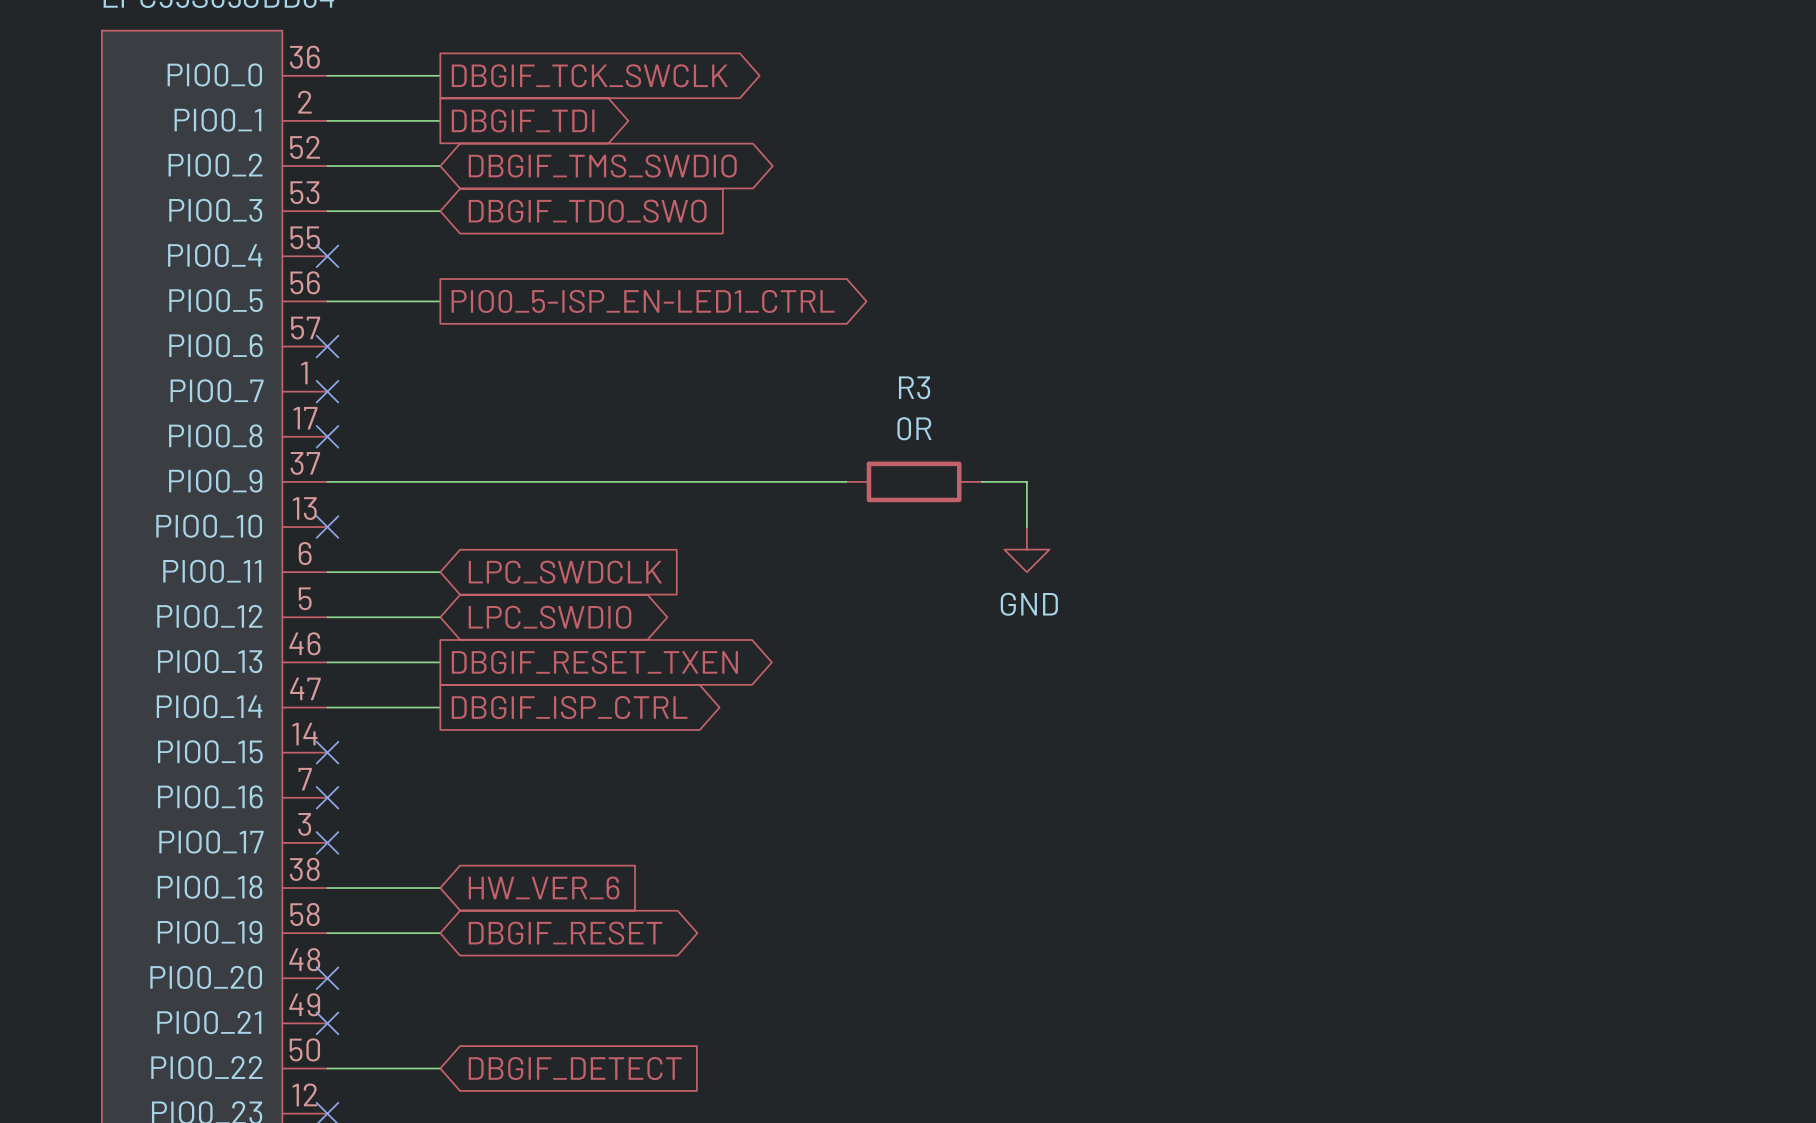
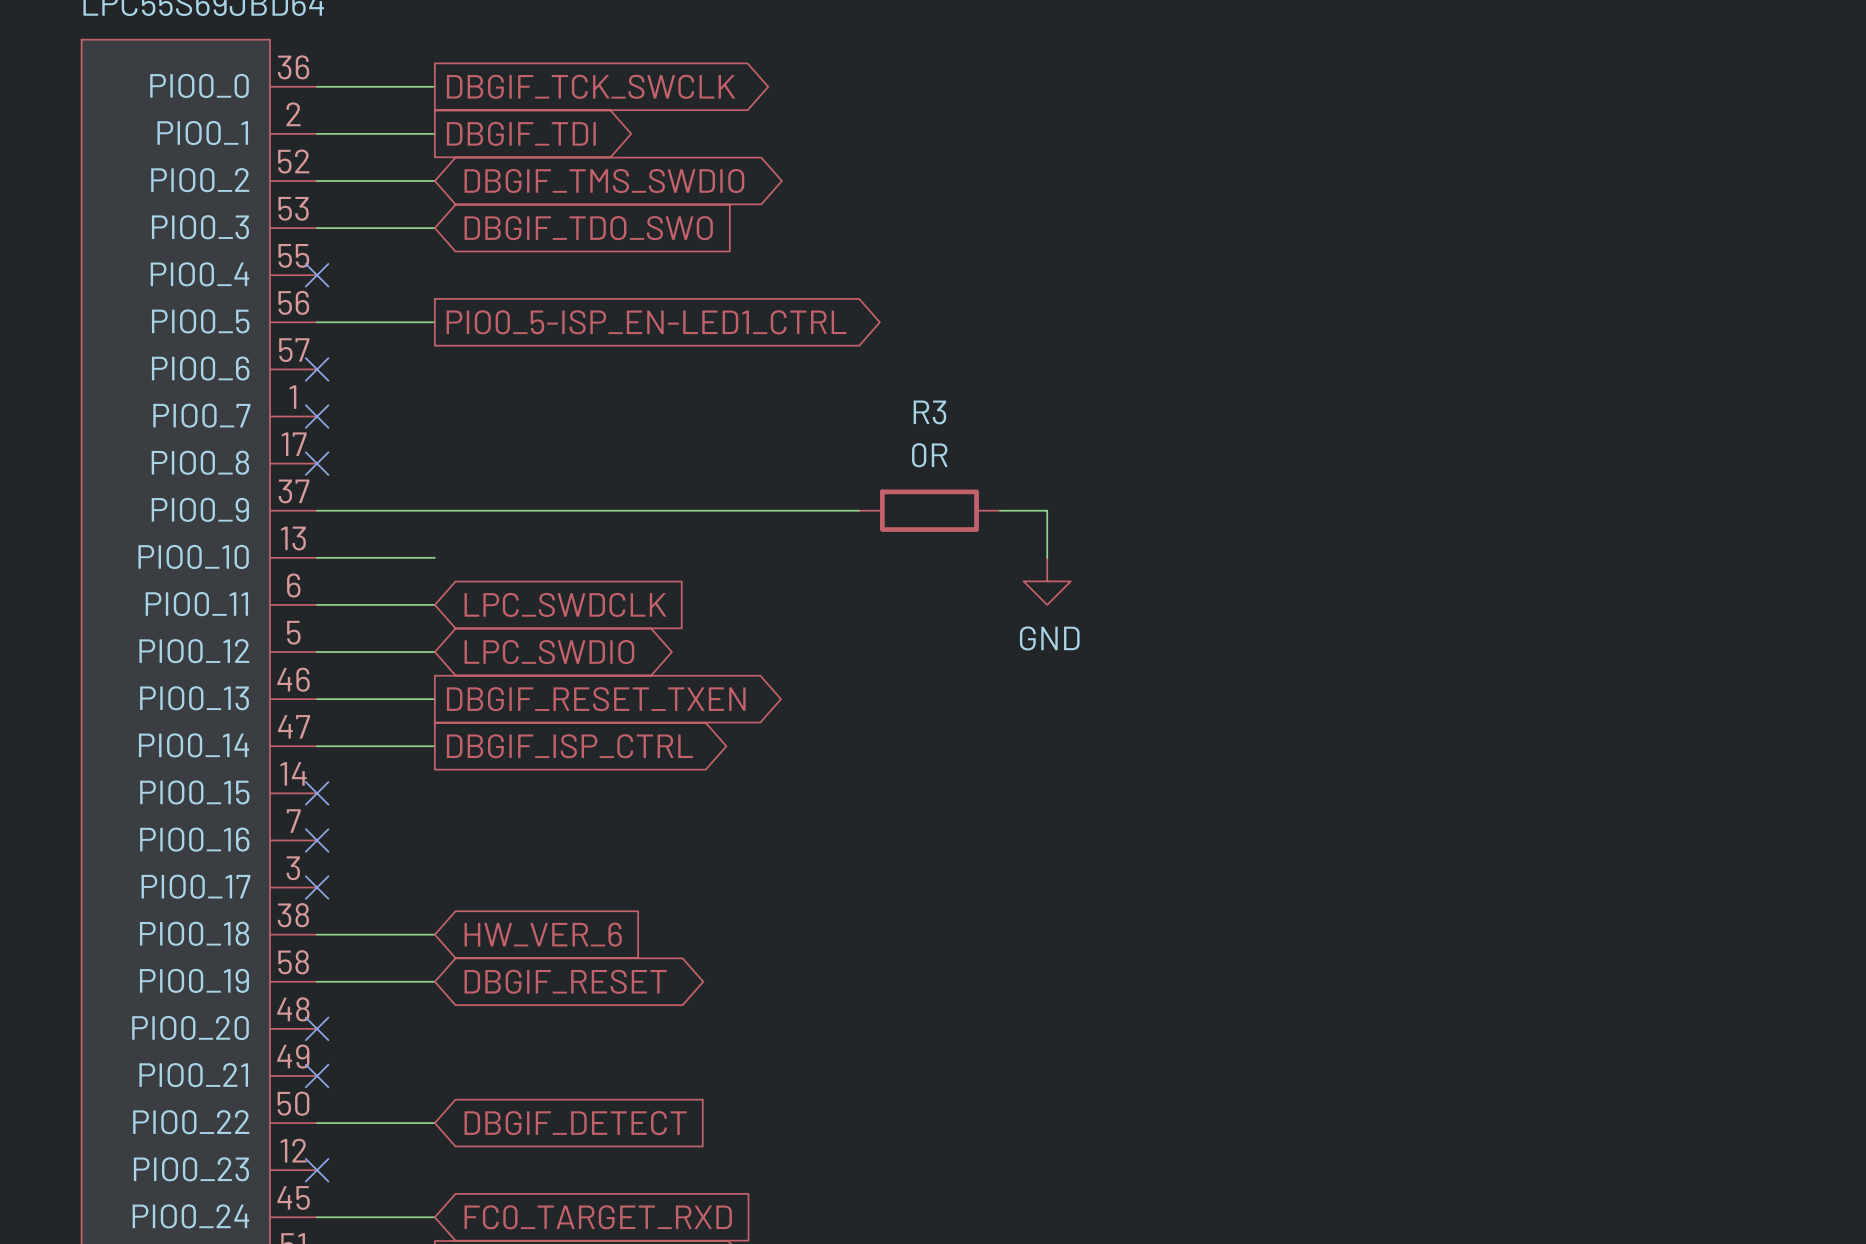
wire: none -> (317, 557) (434, 557)
no-connect mark: (327, 527) -> none

